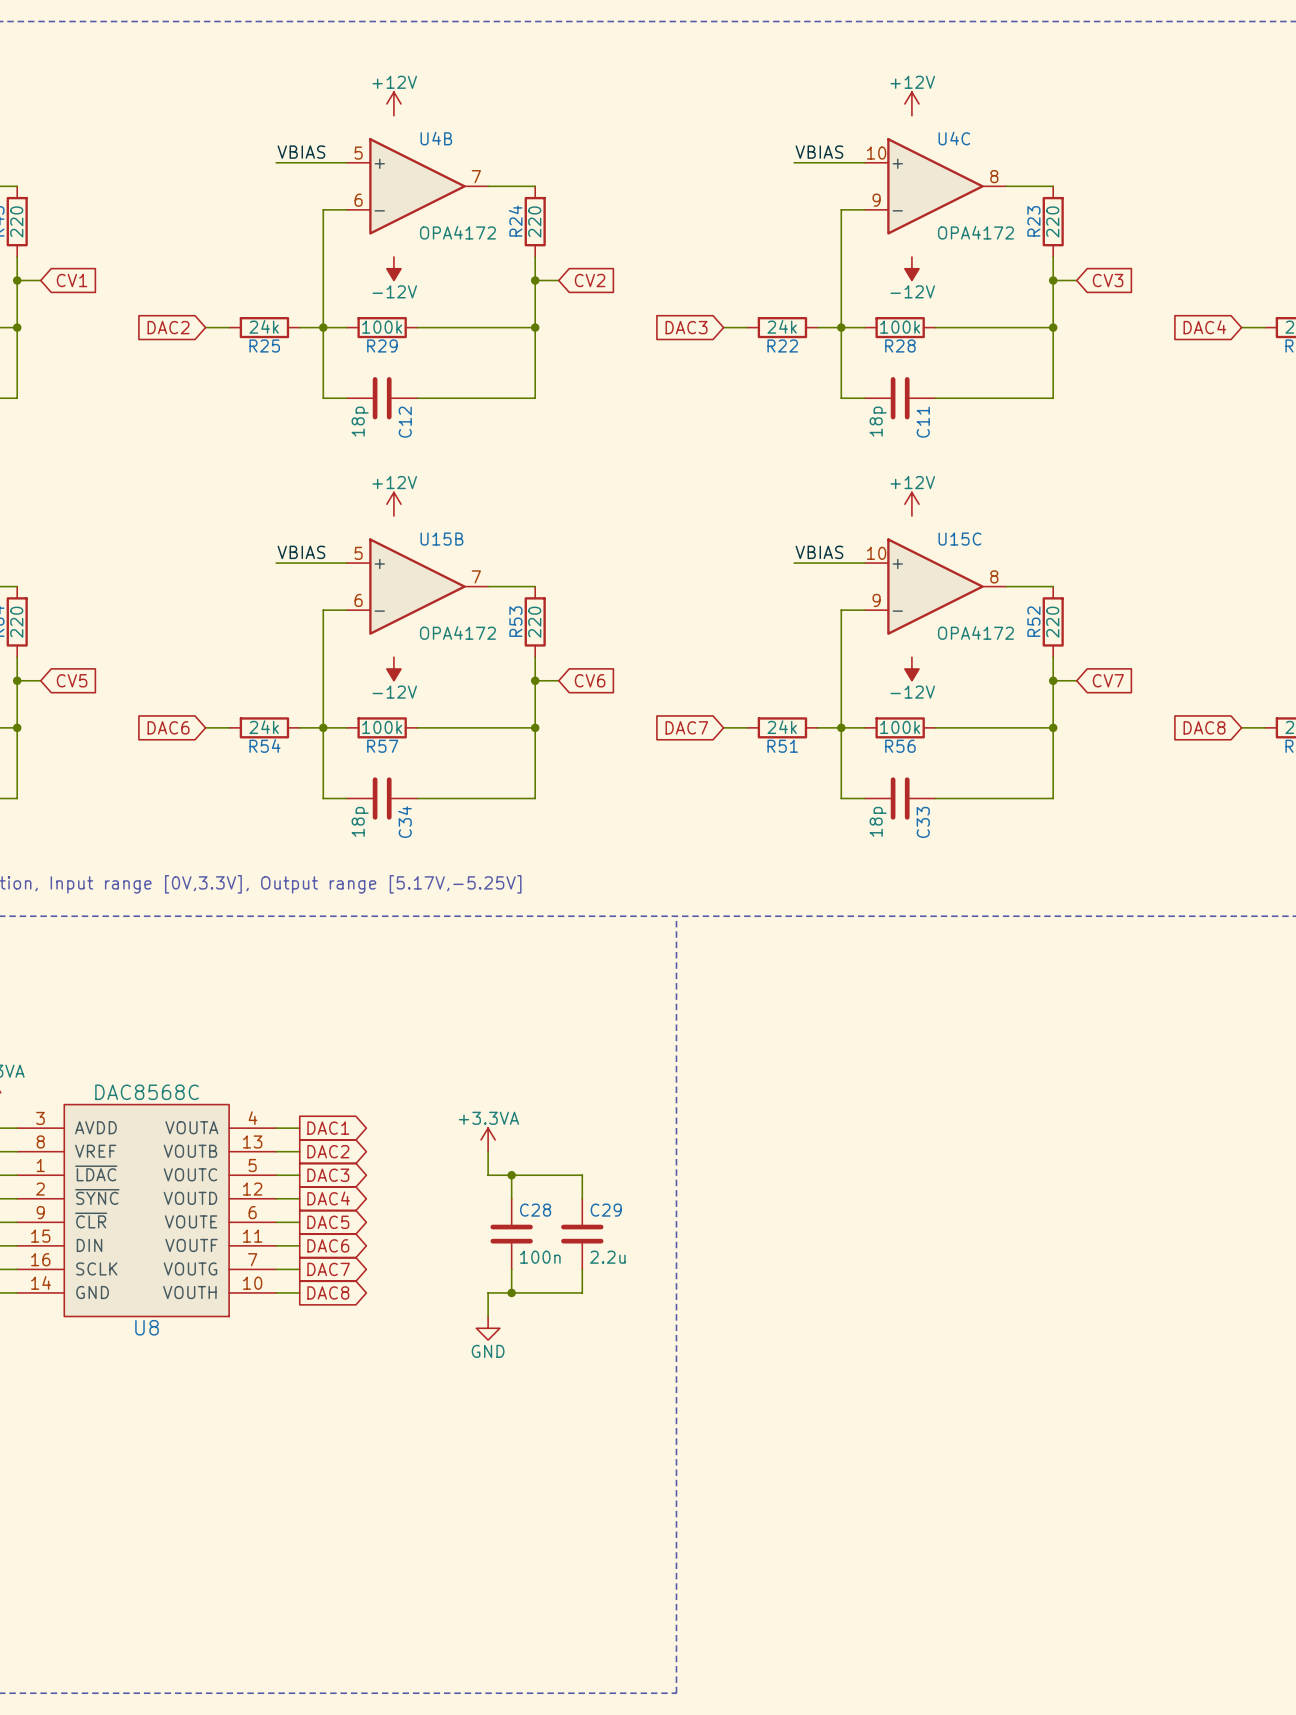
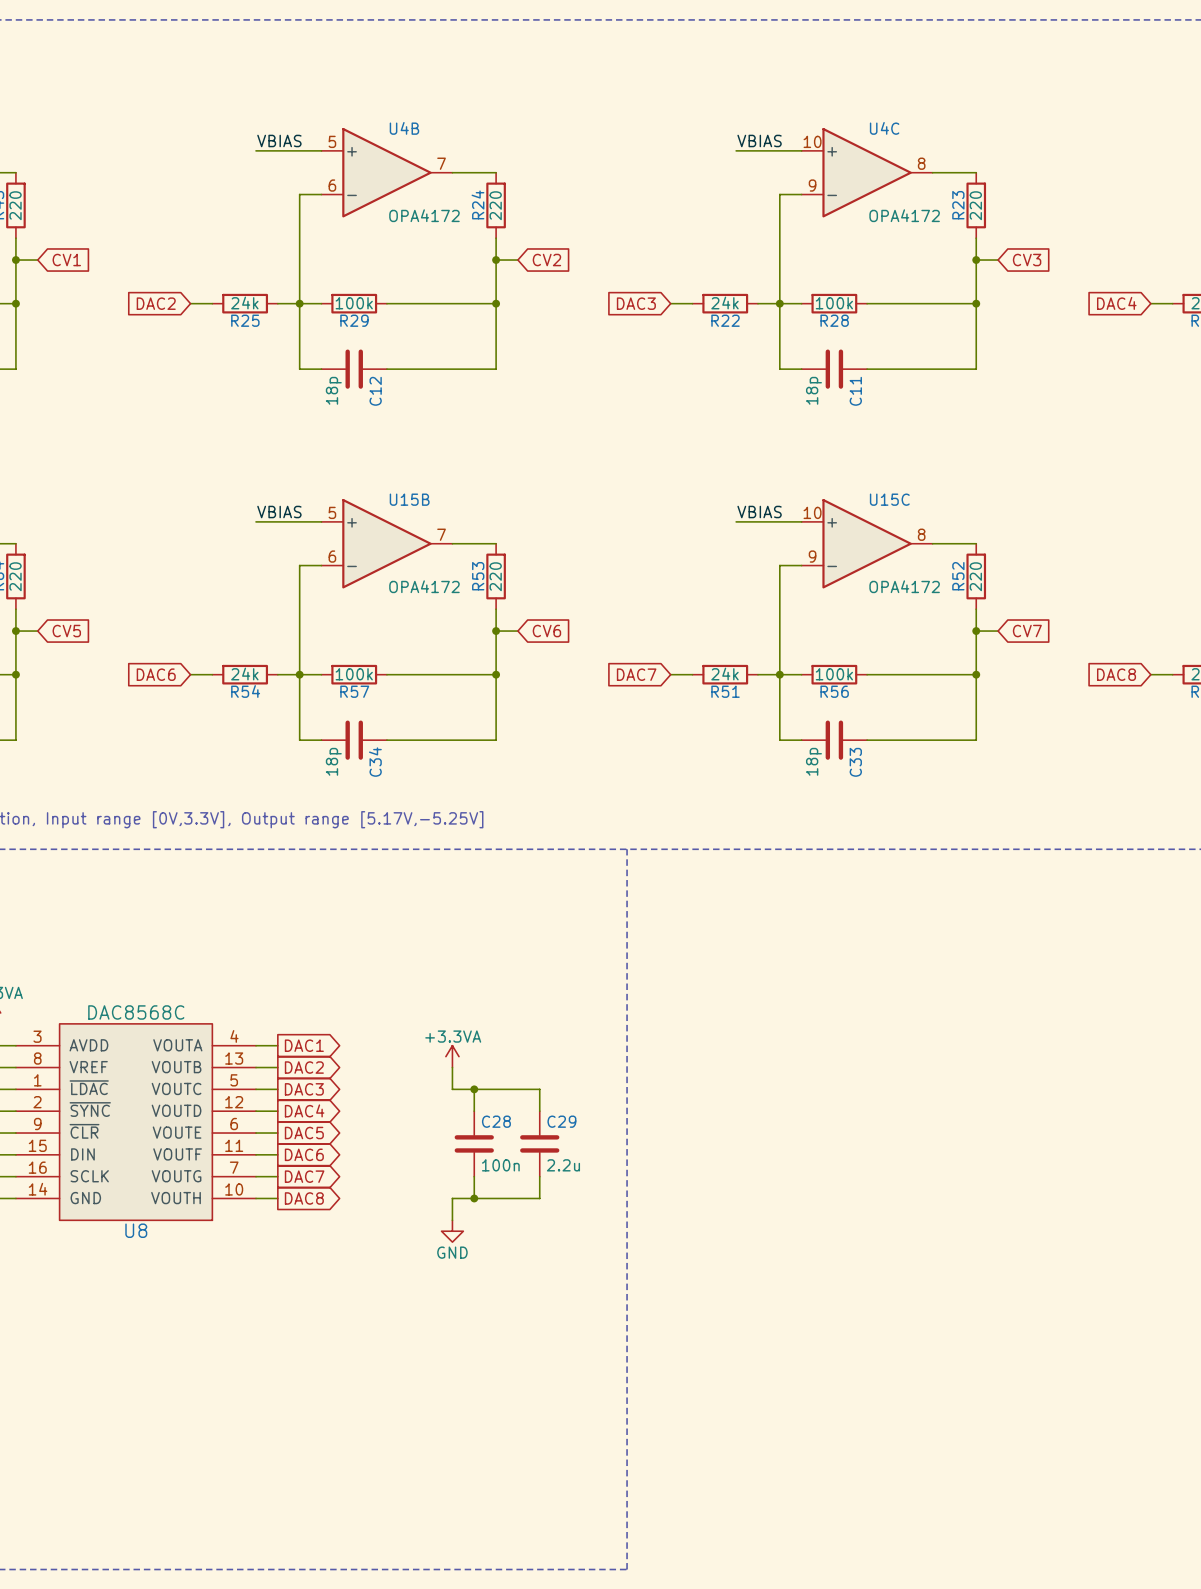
power symbol: +12V (393, 103) -> none
power symbol: +12V (911, 103) -> none
power symbol: -12V (393, 268) -> none
power symbol: -12V (911, 268) -> none
power symbol: +12V (393, 504) -> none
power symbol: +12V (911, 504) -> none
power symbol: -12V (393, 669) -> none
power symbol: -12V (911, 669) -> none

